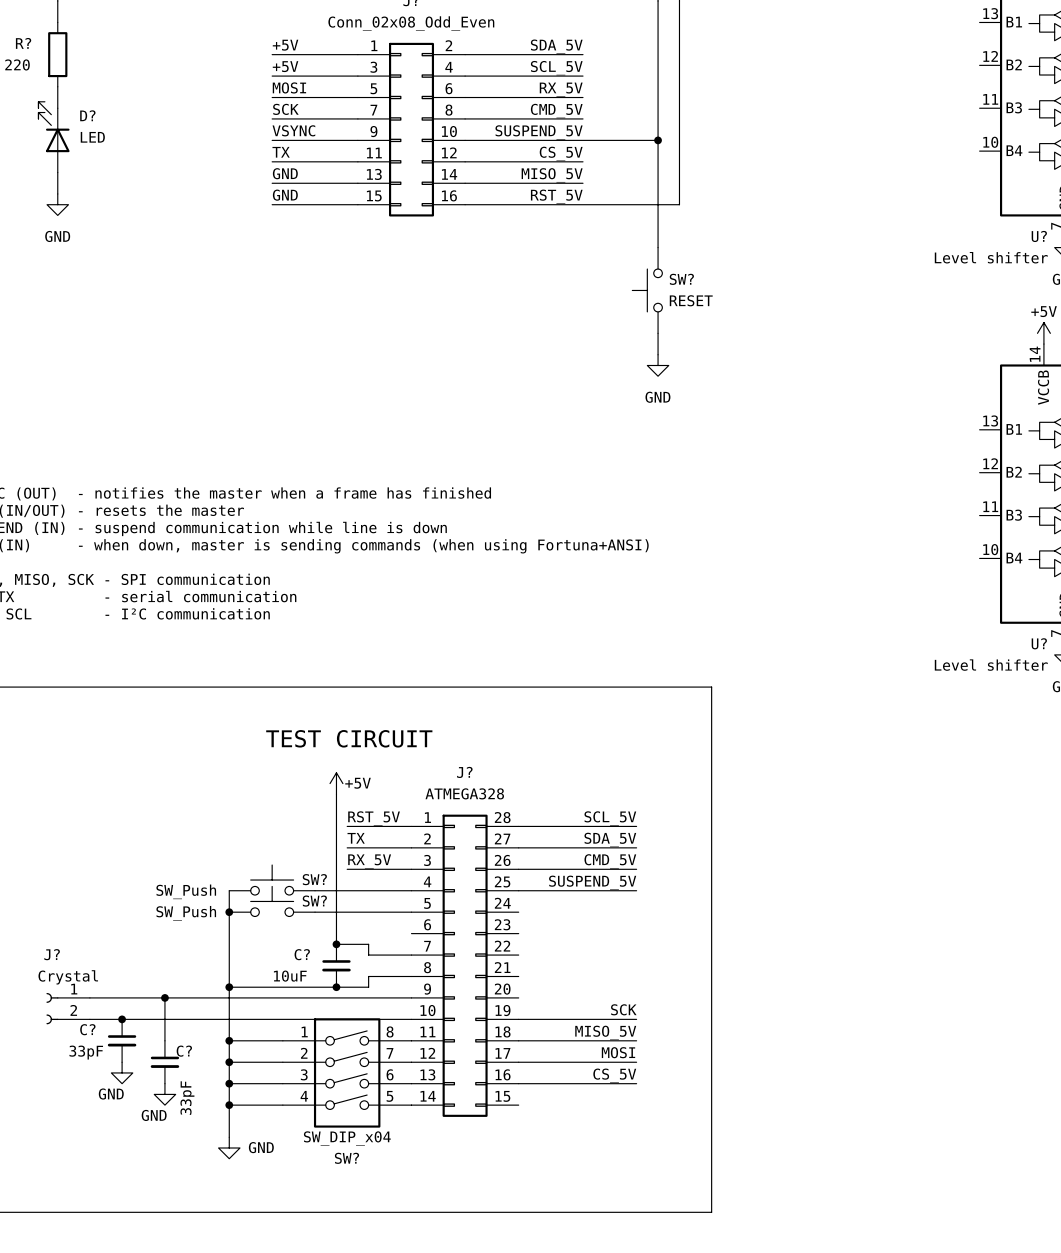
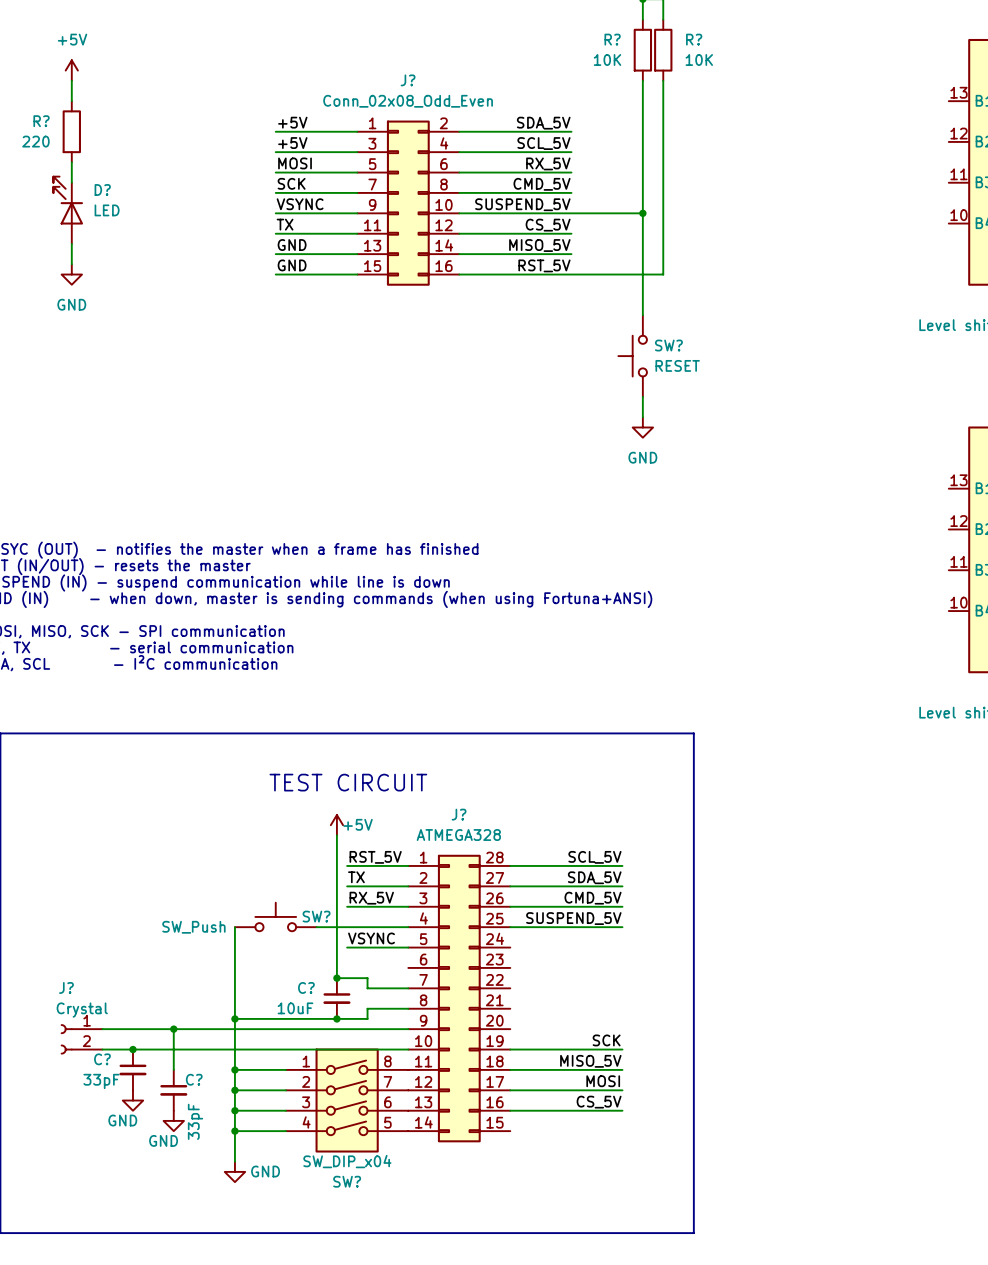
SW?: SW_Push (272, 901) -> none
label: none -> VSYNC (371, 938)
junction: (229, 912) -> none
wire: (315, 912) (347, 912) -> none

